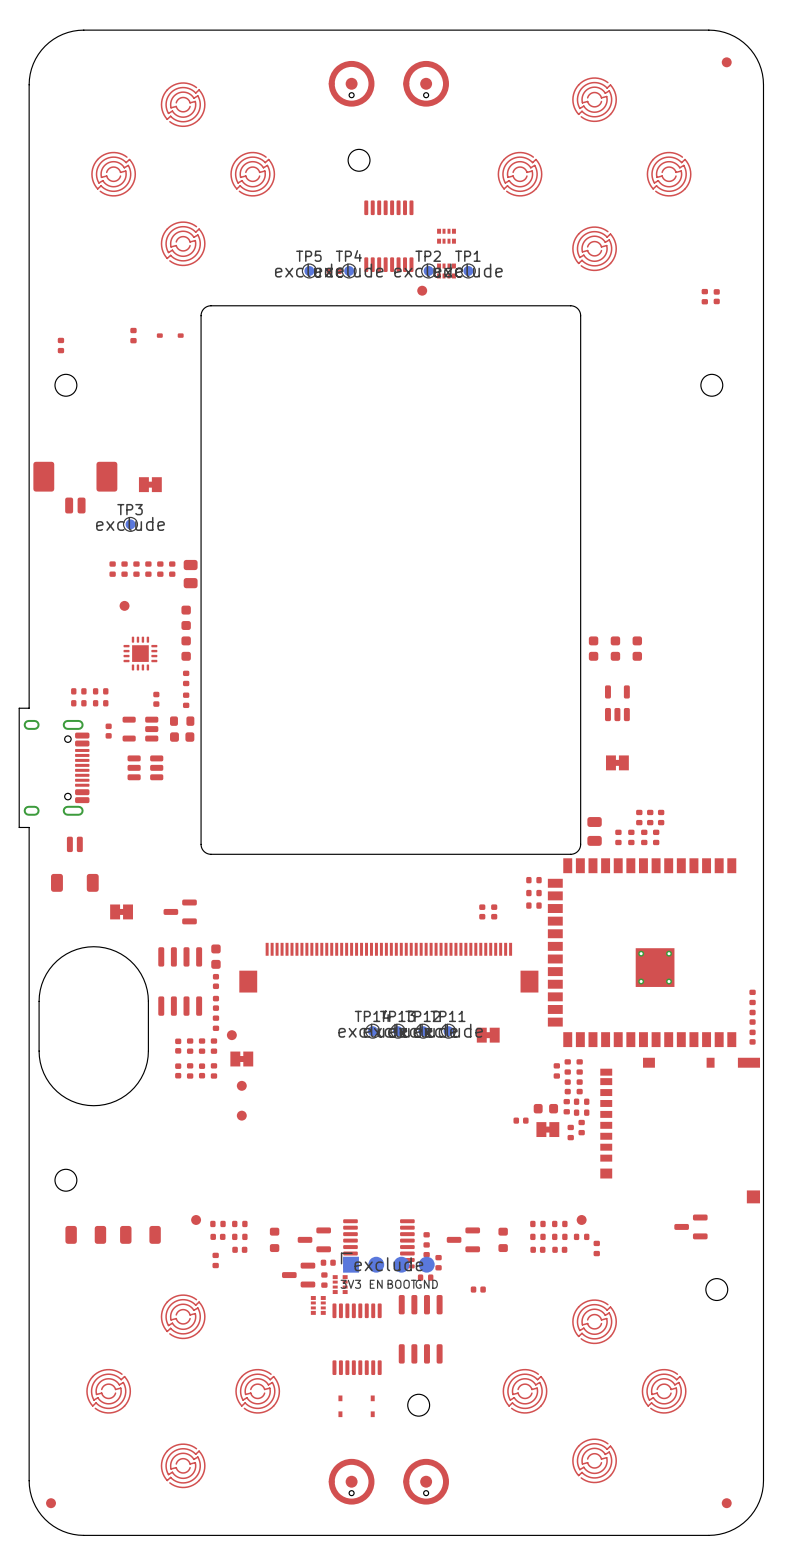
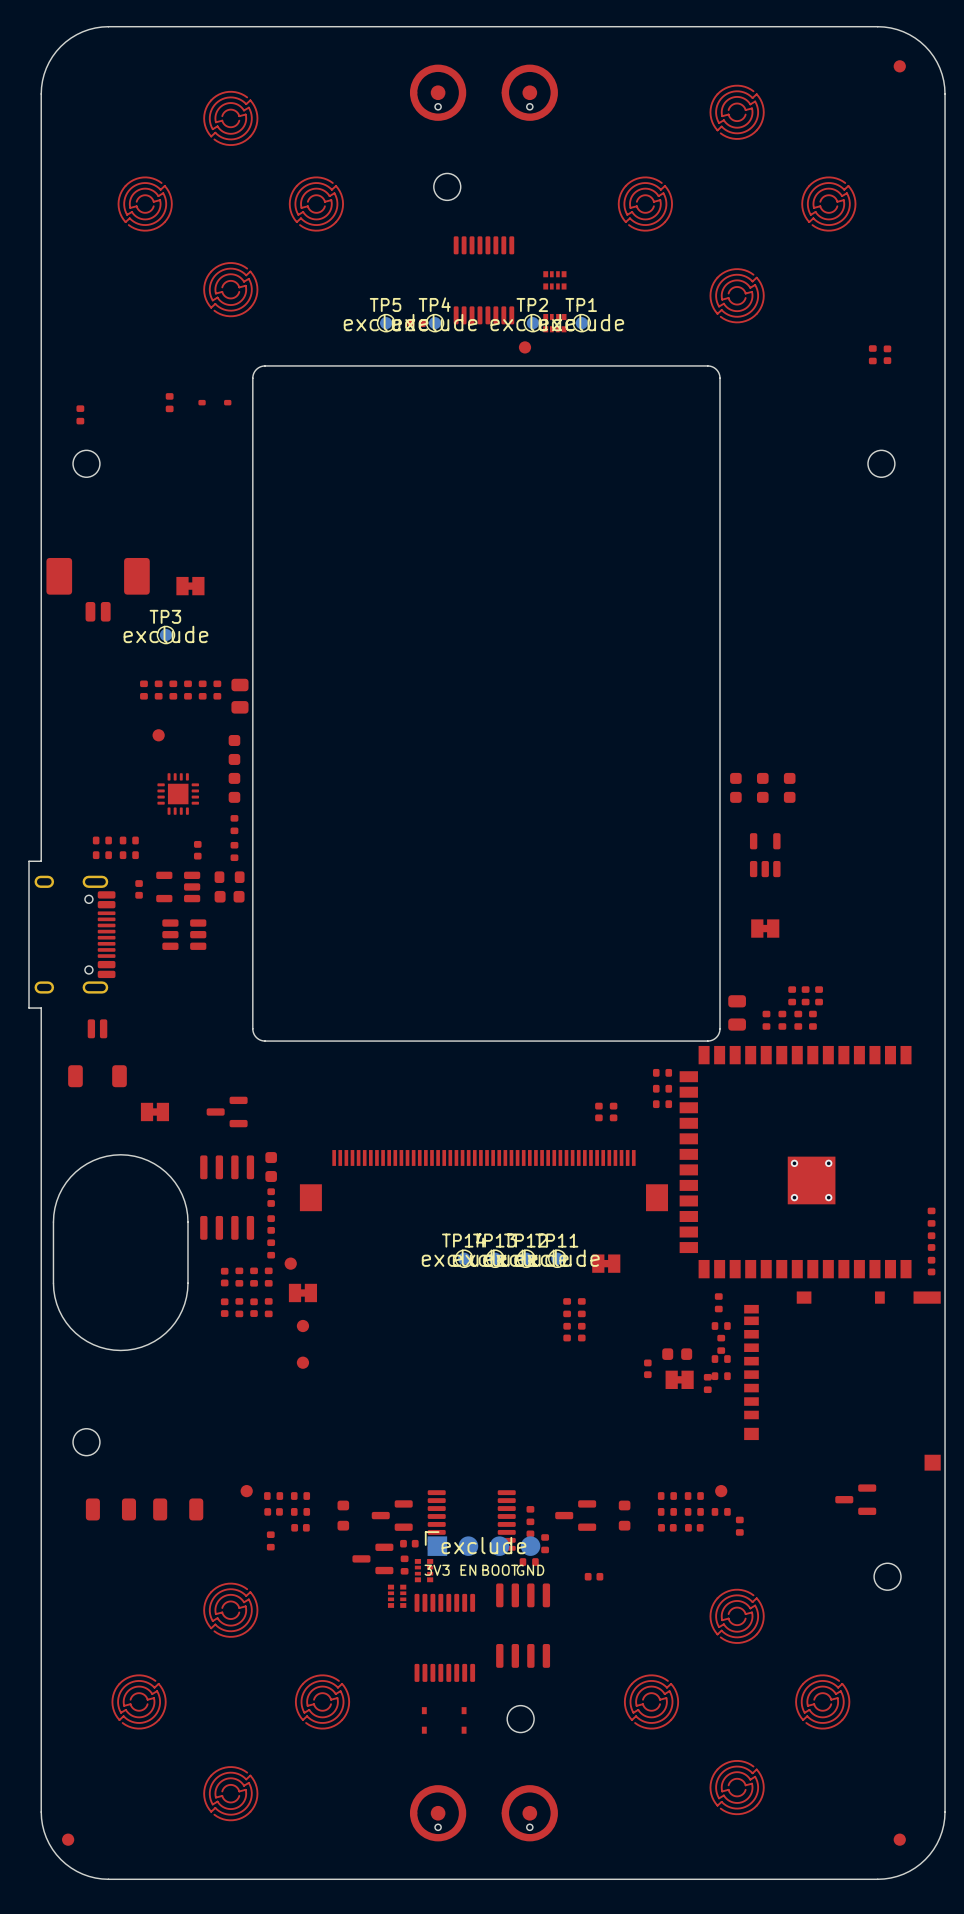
part: (567, 1066) -> none
part: none -> (567, 1307)
part: none -> (581, 1307)
part: (556, 1070) -> none
part footprint: [576, 1079, 583, 1095] -> [711, 1322, 731, 1330]
part: (567, 1086) -> none
part: none -> (567, 1332)
part: none -> (581, 1332)
part rotation: 0° (581, 1101) -> 90° clockwise (721, 1344)
part: (566, 1106) -> none
part rotation: 0° (521, 1120) -> 90° clockwise (647, 1368)
part rotation: 0° (581, 1127) -> 90° clockwise (721, 1376)

